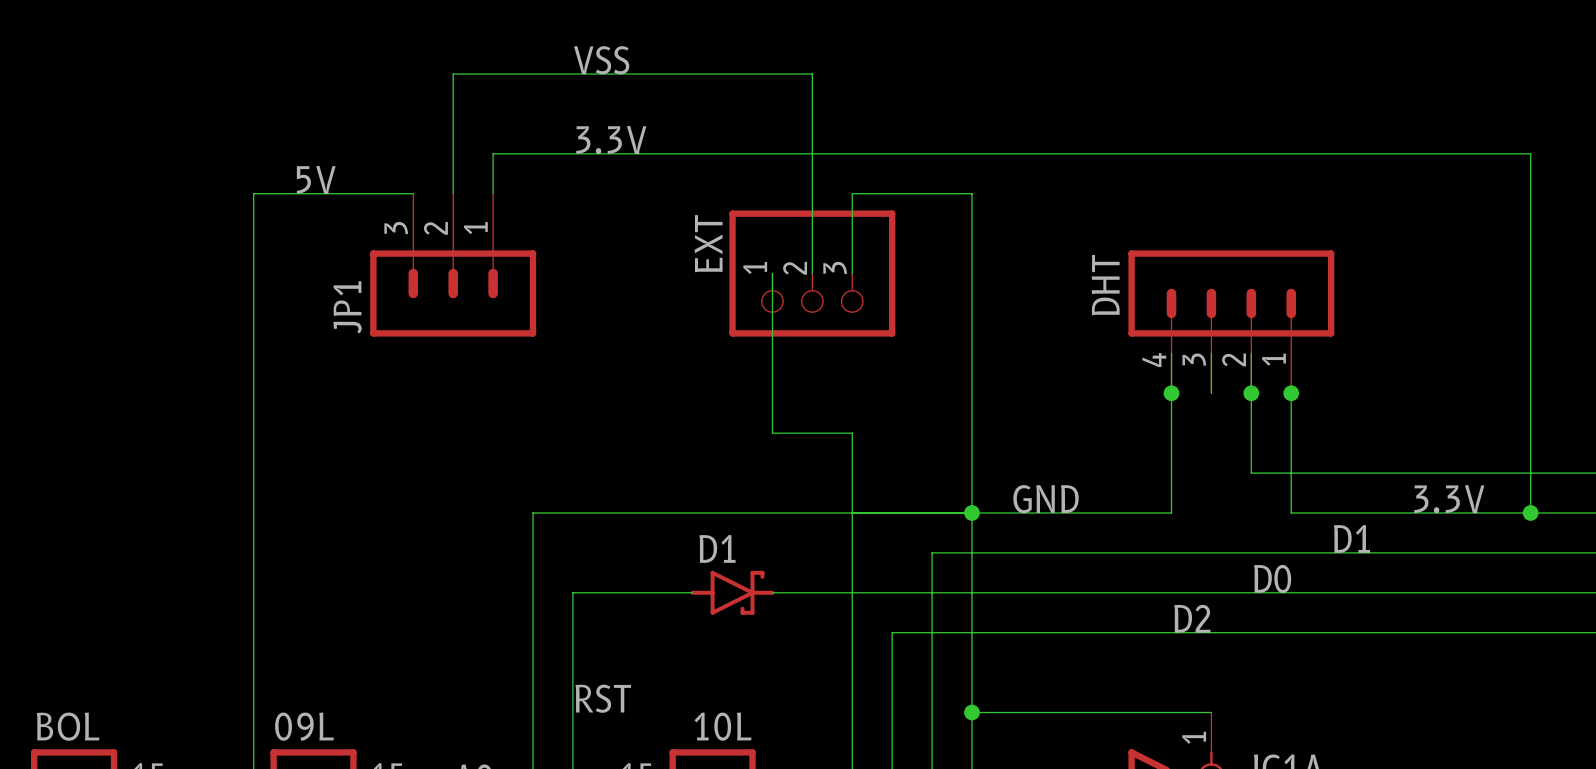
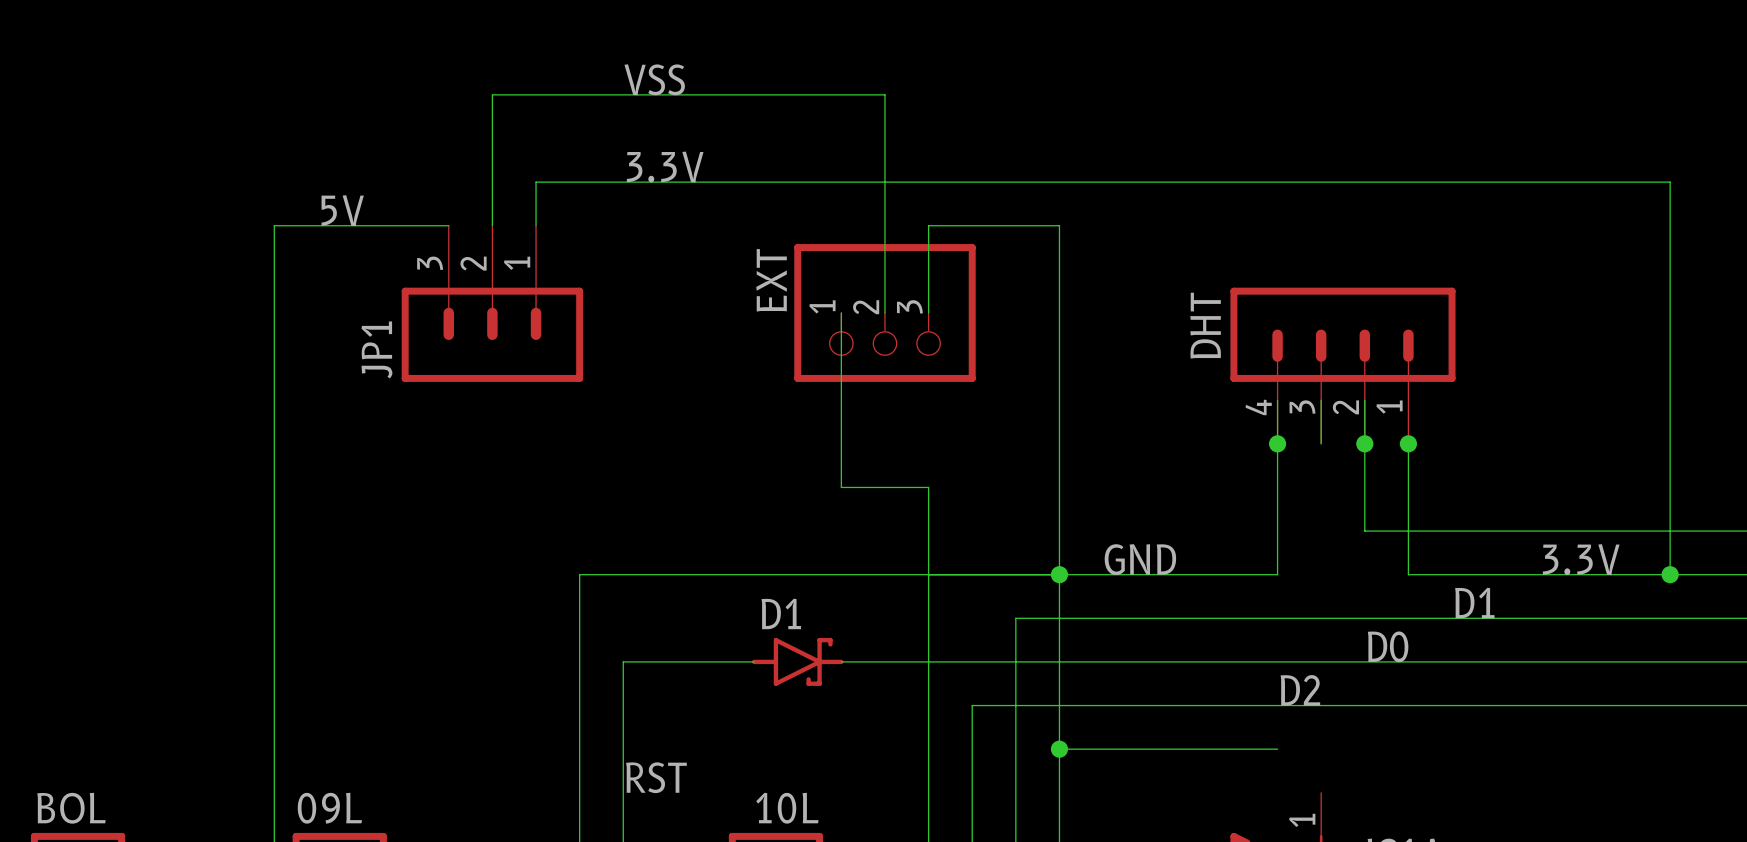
wire: none -> (1059, 749) (1277, 749)
wire: (971, 712) (1211, 712) -> none
junction position: (971, 712) -> (1059, 749)

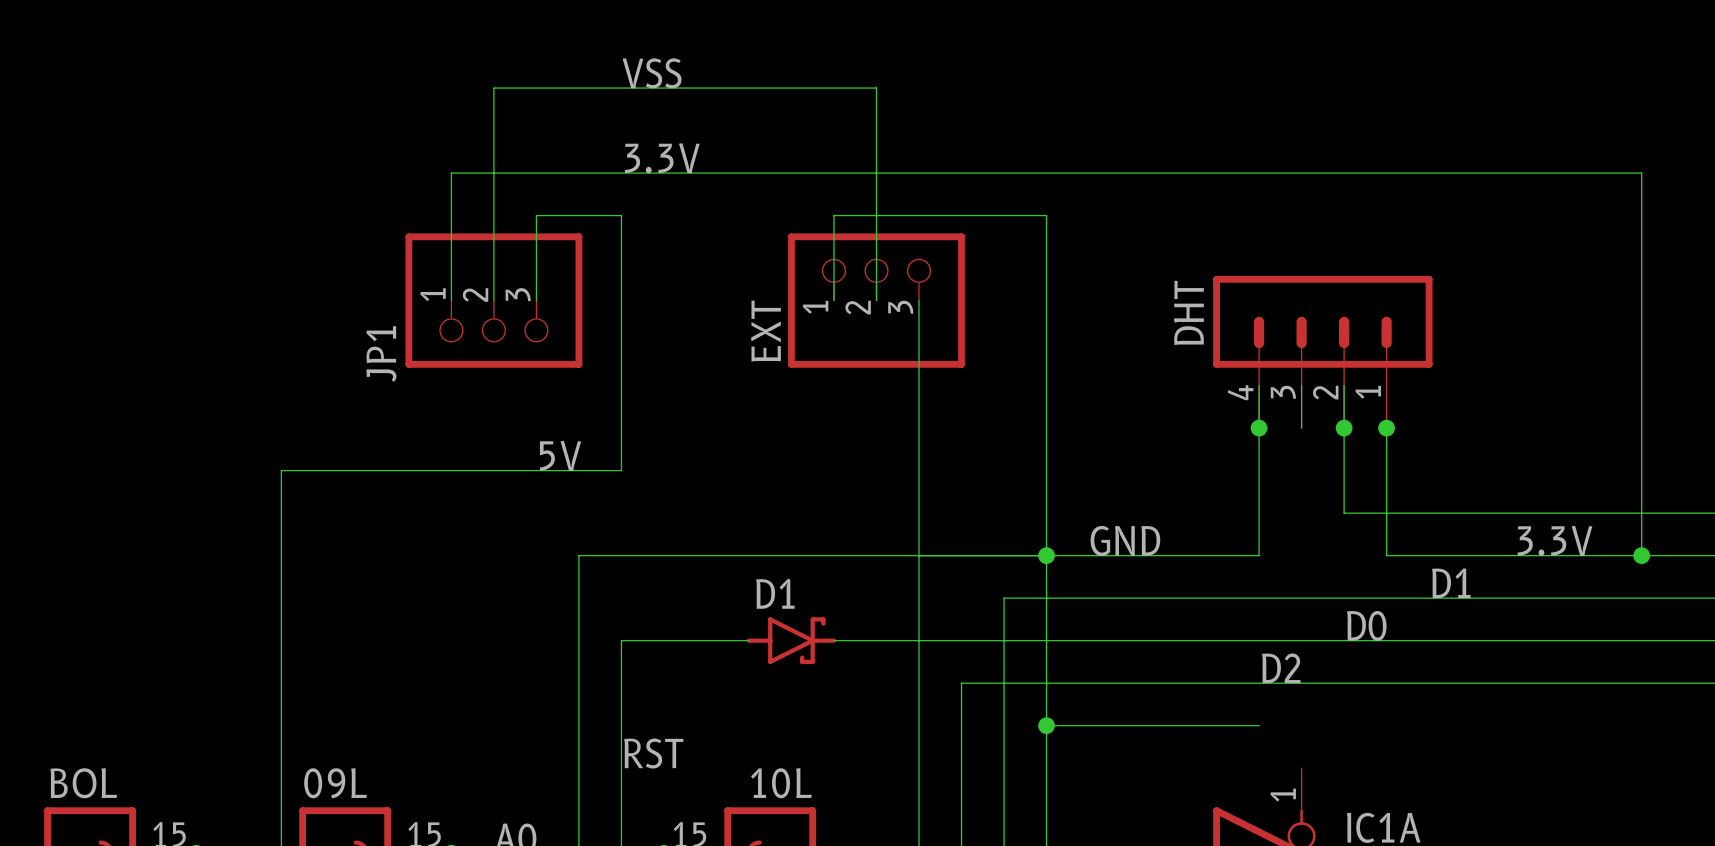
wire: (536, 182) (536, 225) -> (536, 173) (451, 173) (451, 300)
label position: 5V (342, 210) -> 5V (560, 455)
JP1 symbol: [401, 225, 584, 382] -> [405, 233, 583, 368]
wire: (448, 225) (274, 225) (274, 487) -> (536, 300) (536, 215) (621, 215) (621, 470) (281, 470)
wire: (928, 225) (928, 312) -> (919, 215) (833, 215) (833, 300)
wire: (841, 312) (841, 487) (928, 487) -> (919, 300) (919, 470)
EXT flip: as is (884, 312) -> up-down (876, 300)
JP1 name position: JP1 (376, 349) -> JP1 (381, 354)

